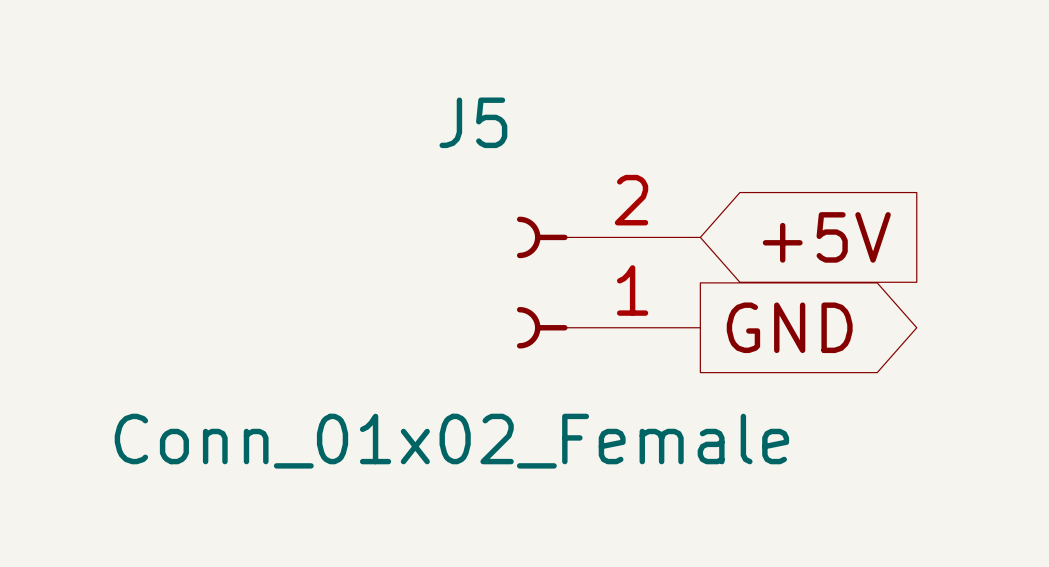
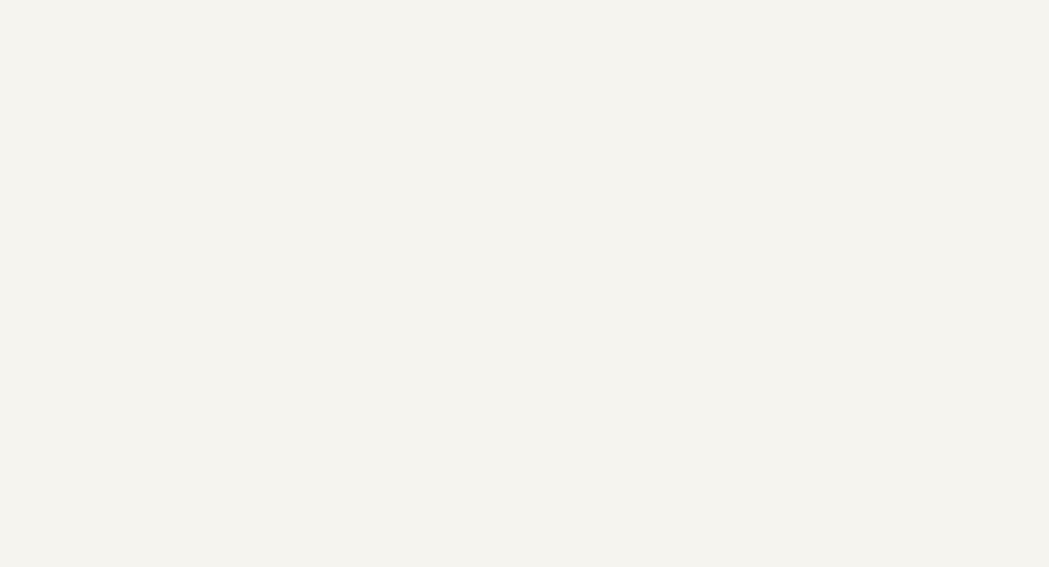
global label: +5V (826, 237) -> none
J5: Conn_01x02_Female (608, 282) -> none
global label: GND (789, 327) -> none

